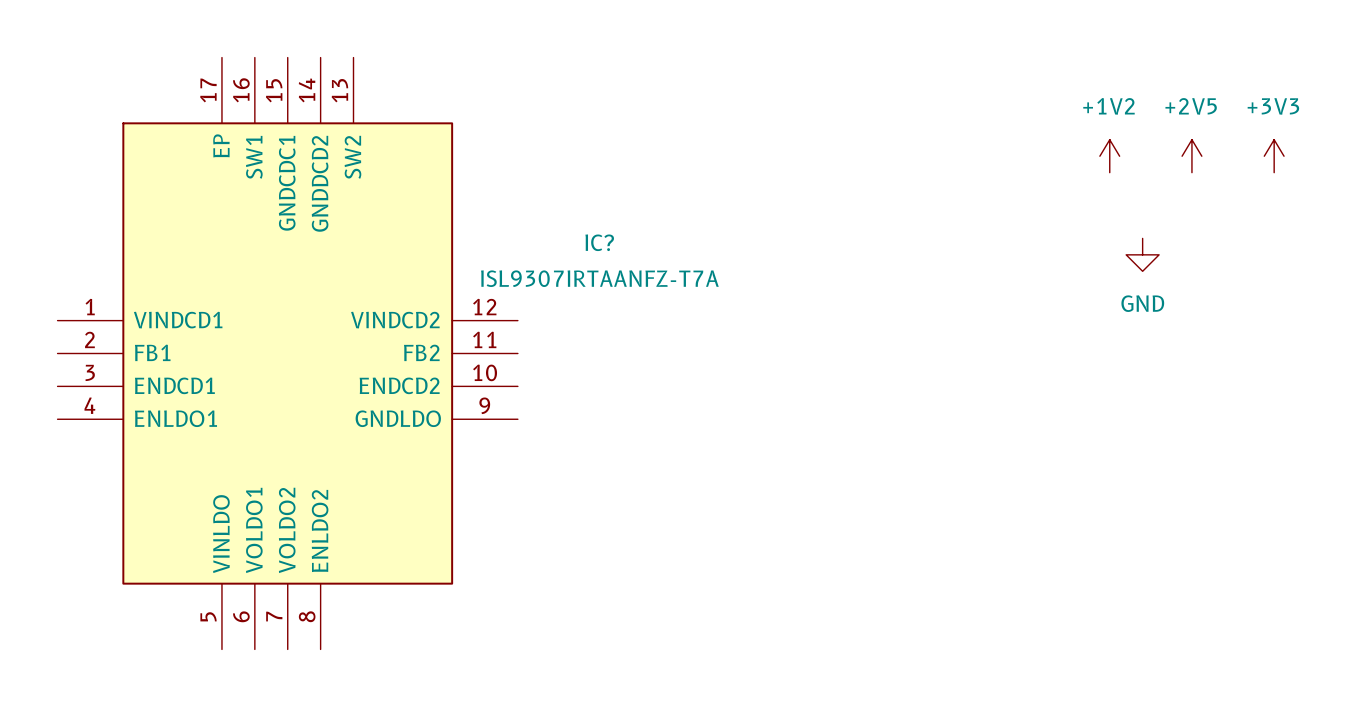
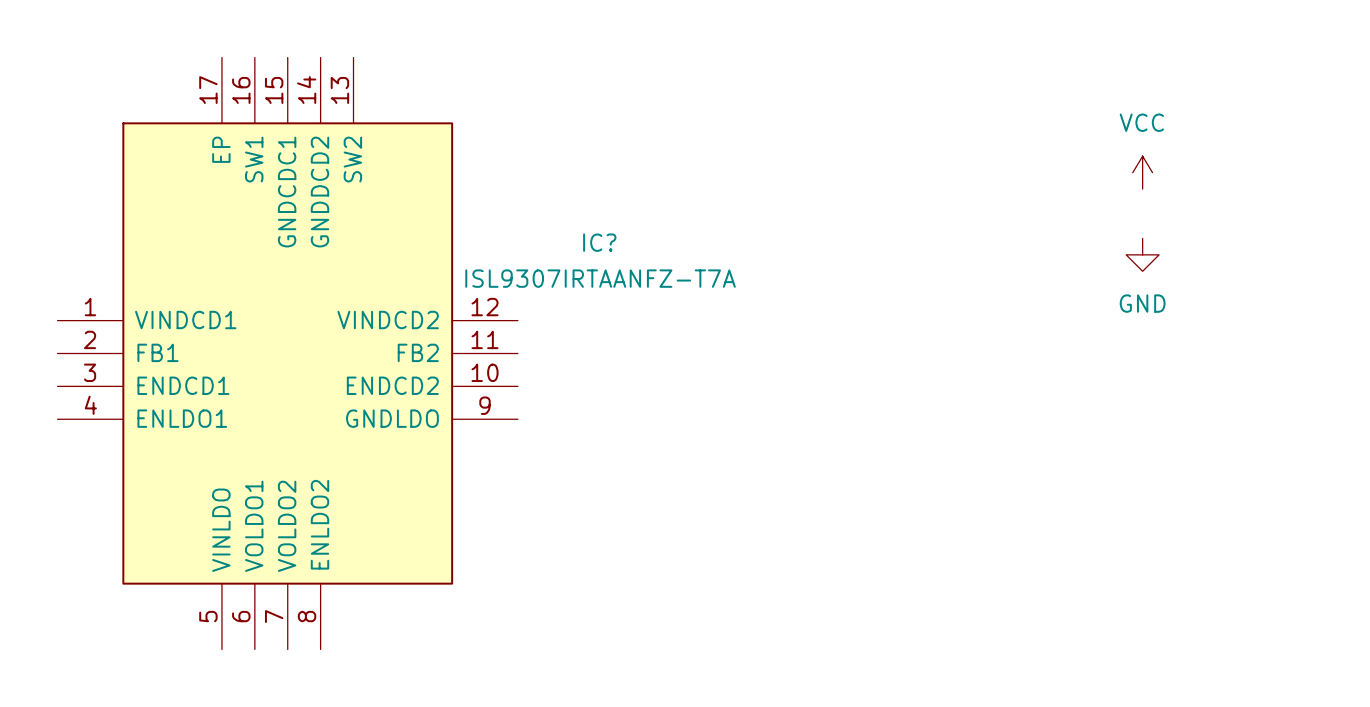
power symbol: +1V2 (1109, 156) -> none
power symbol: +2V5 (1191, 156) -> none
power symbol: +3V3 (1274, 156) -> none
power symbol: none -> VCC (1142, 172)

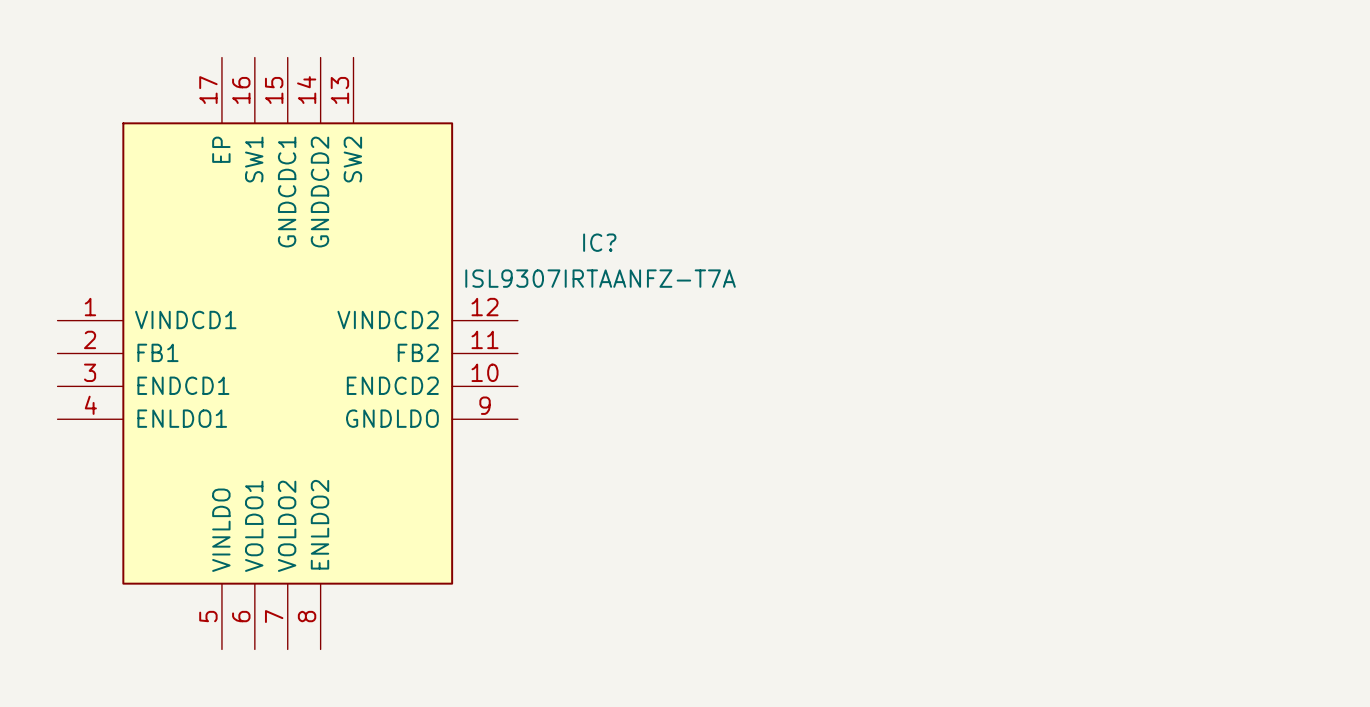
power symbol: VCC (1142, 172) -> none
power symbol: GND (1142, 254) -> none

